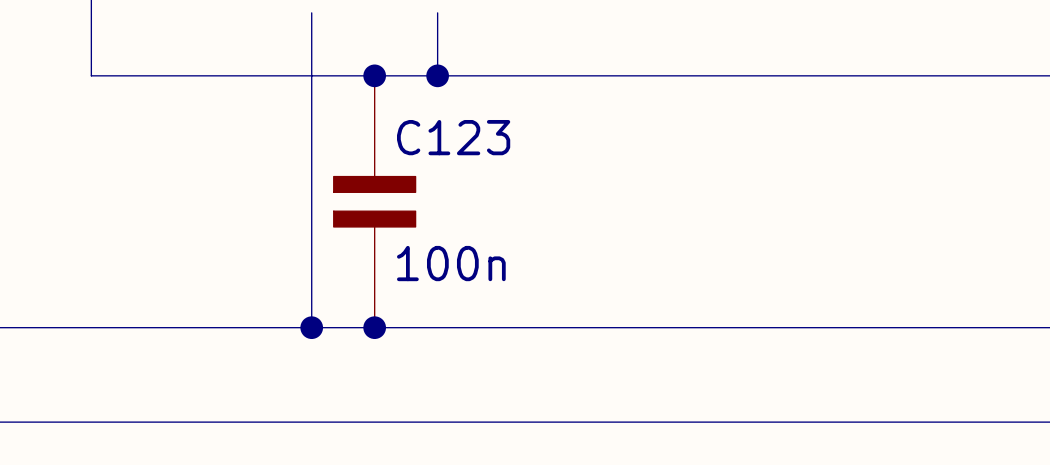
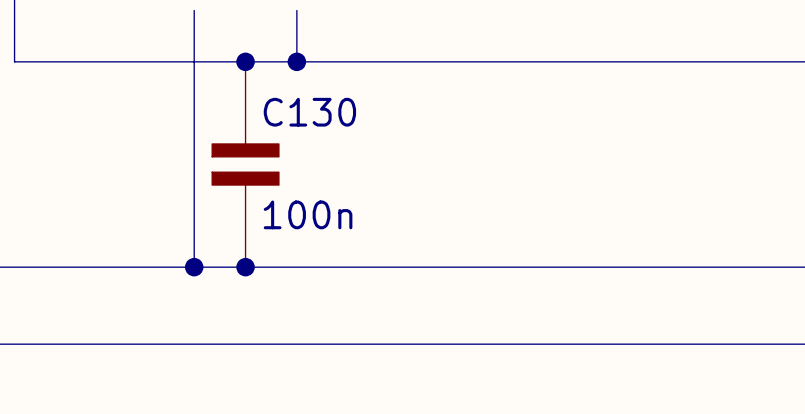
C123 name: C123 (453, 137) -> C130 (309, 112)

